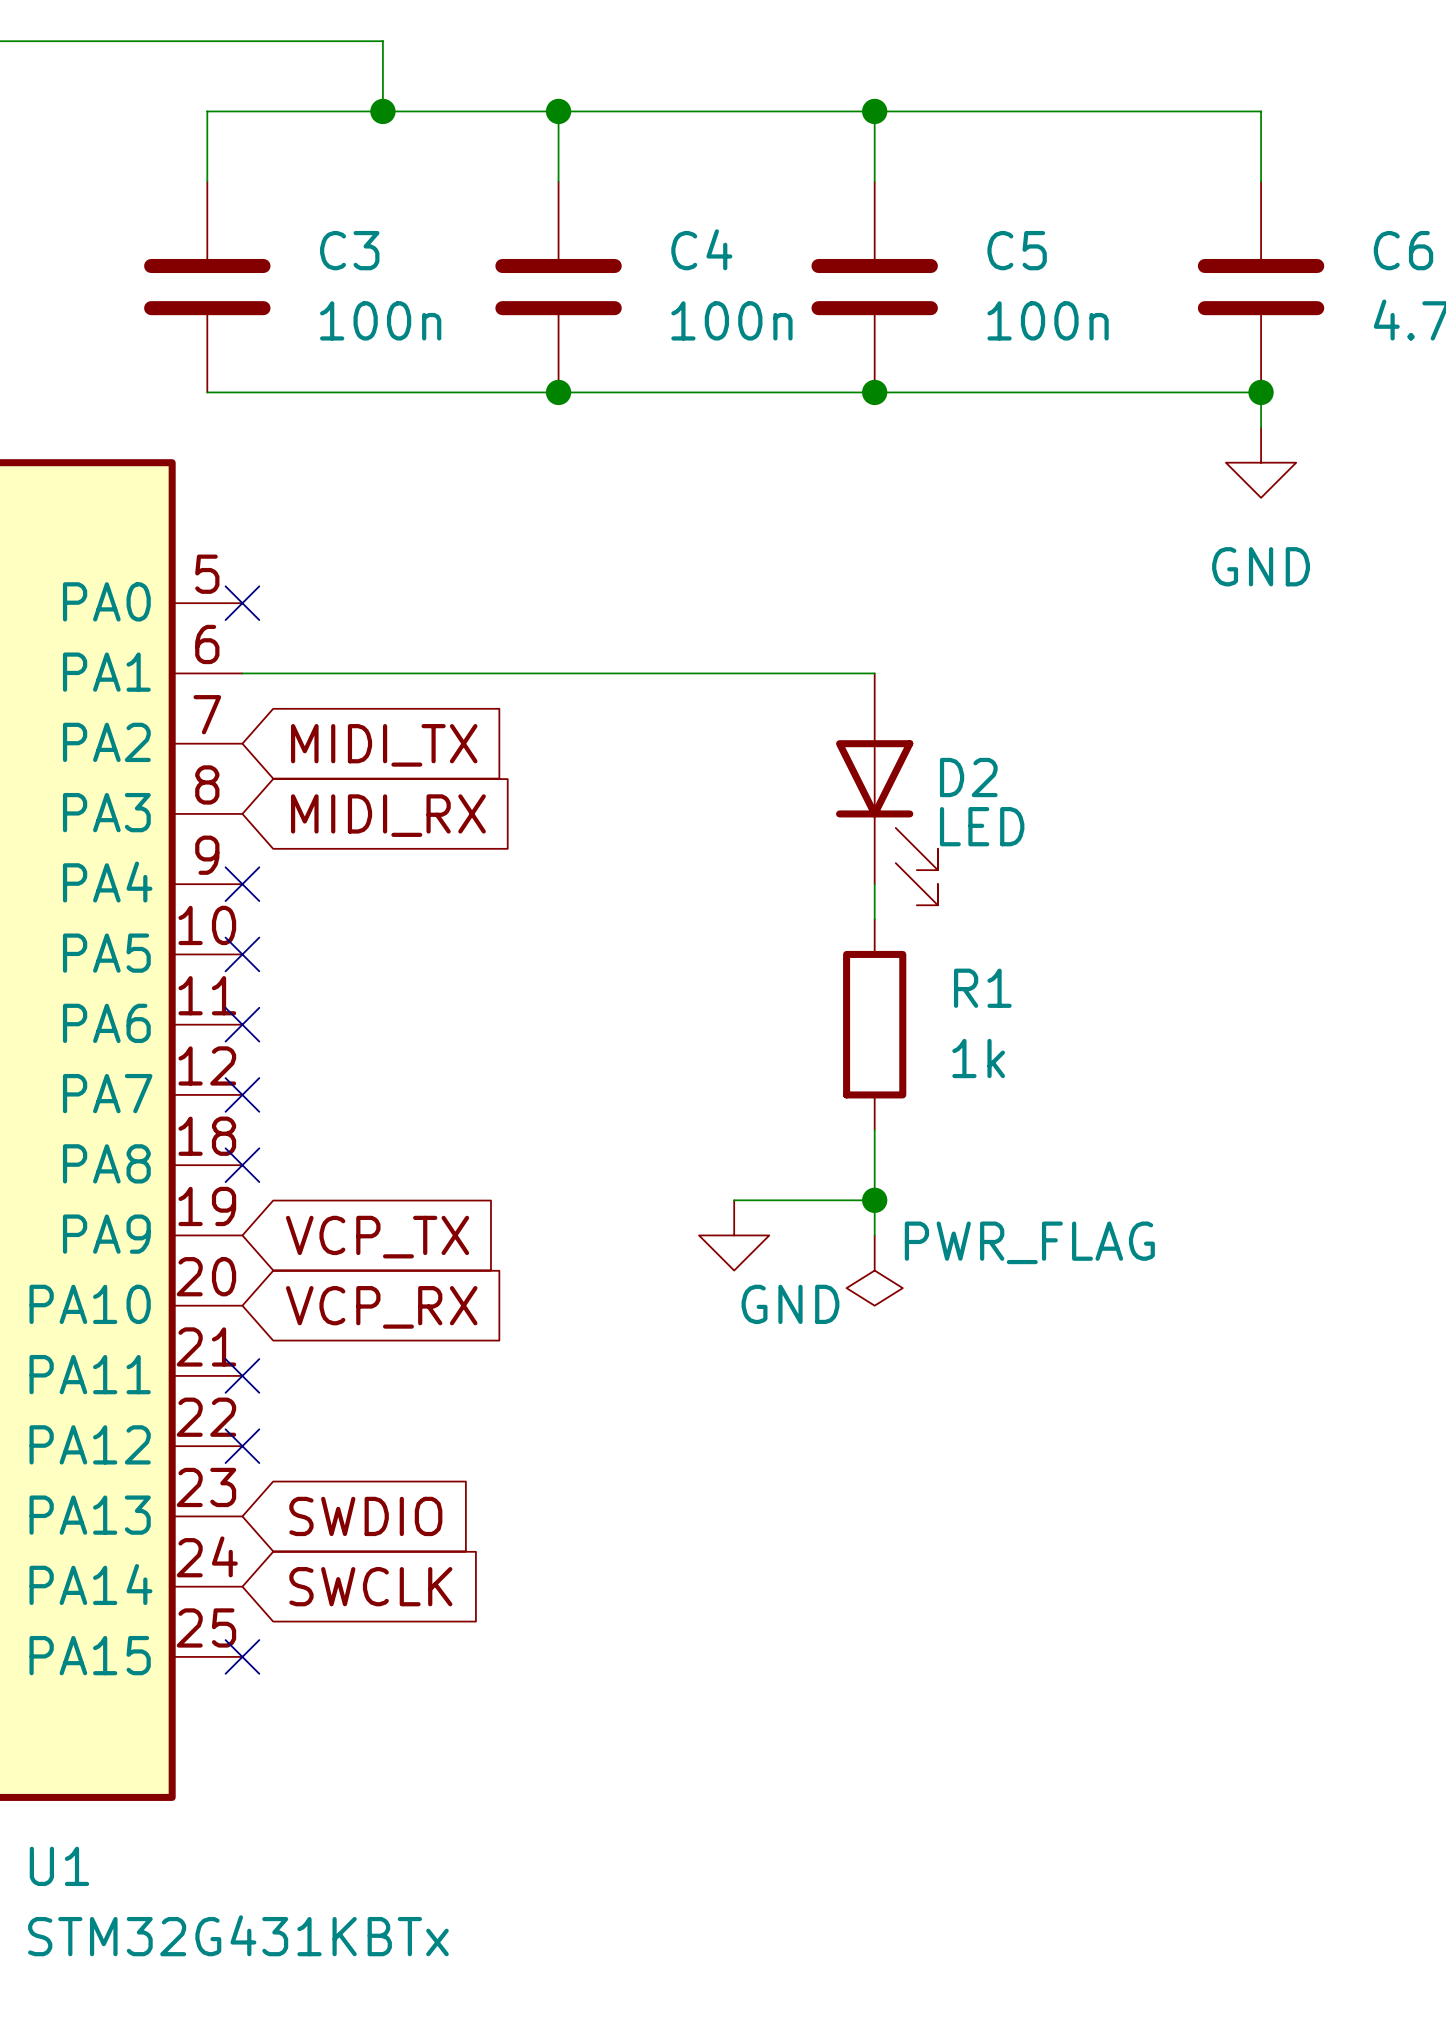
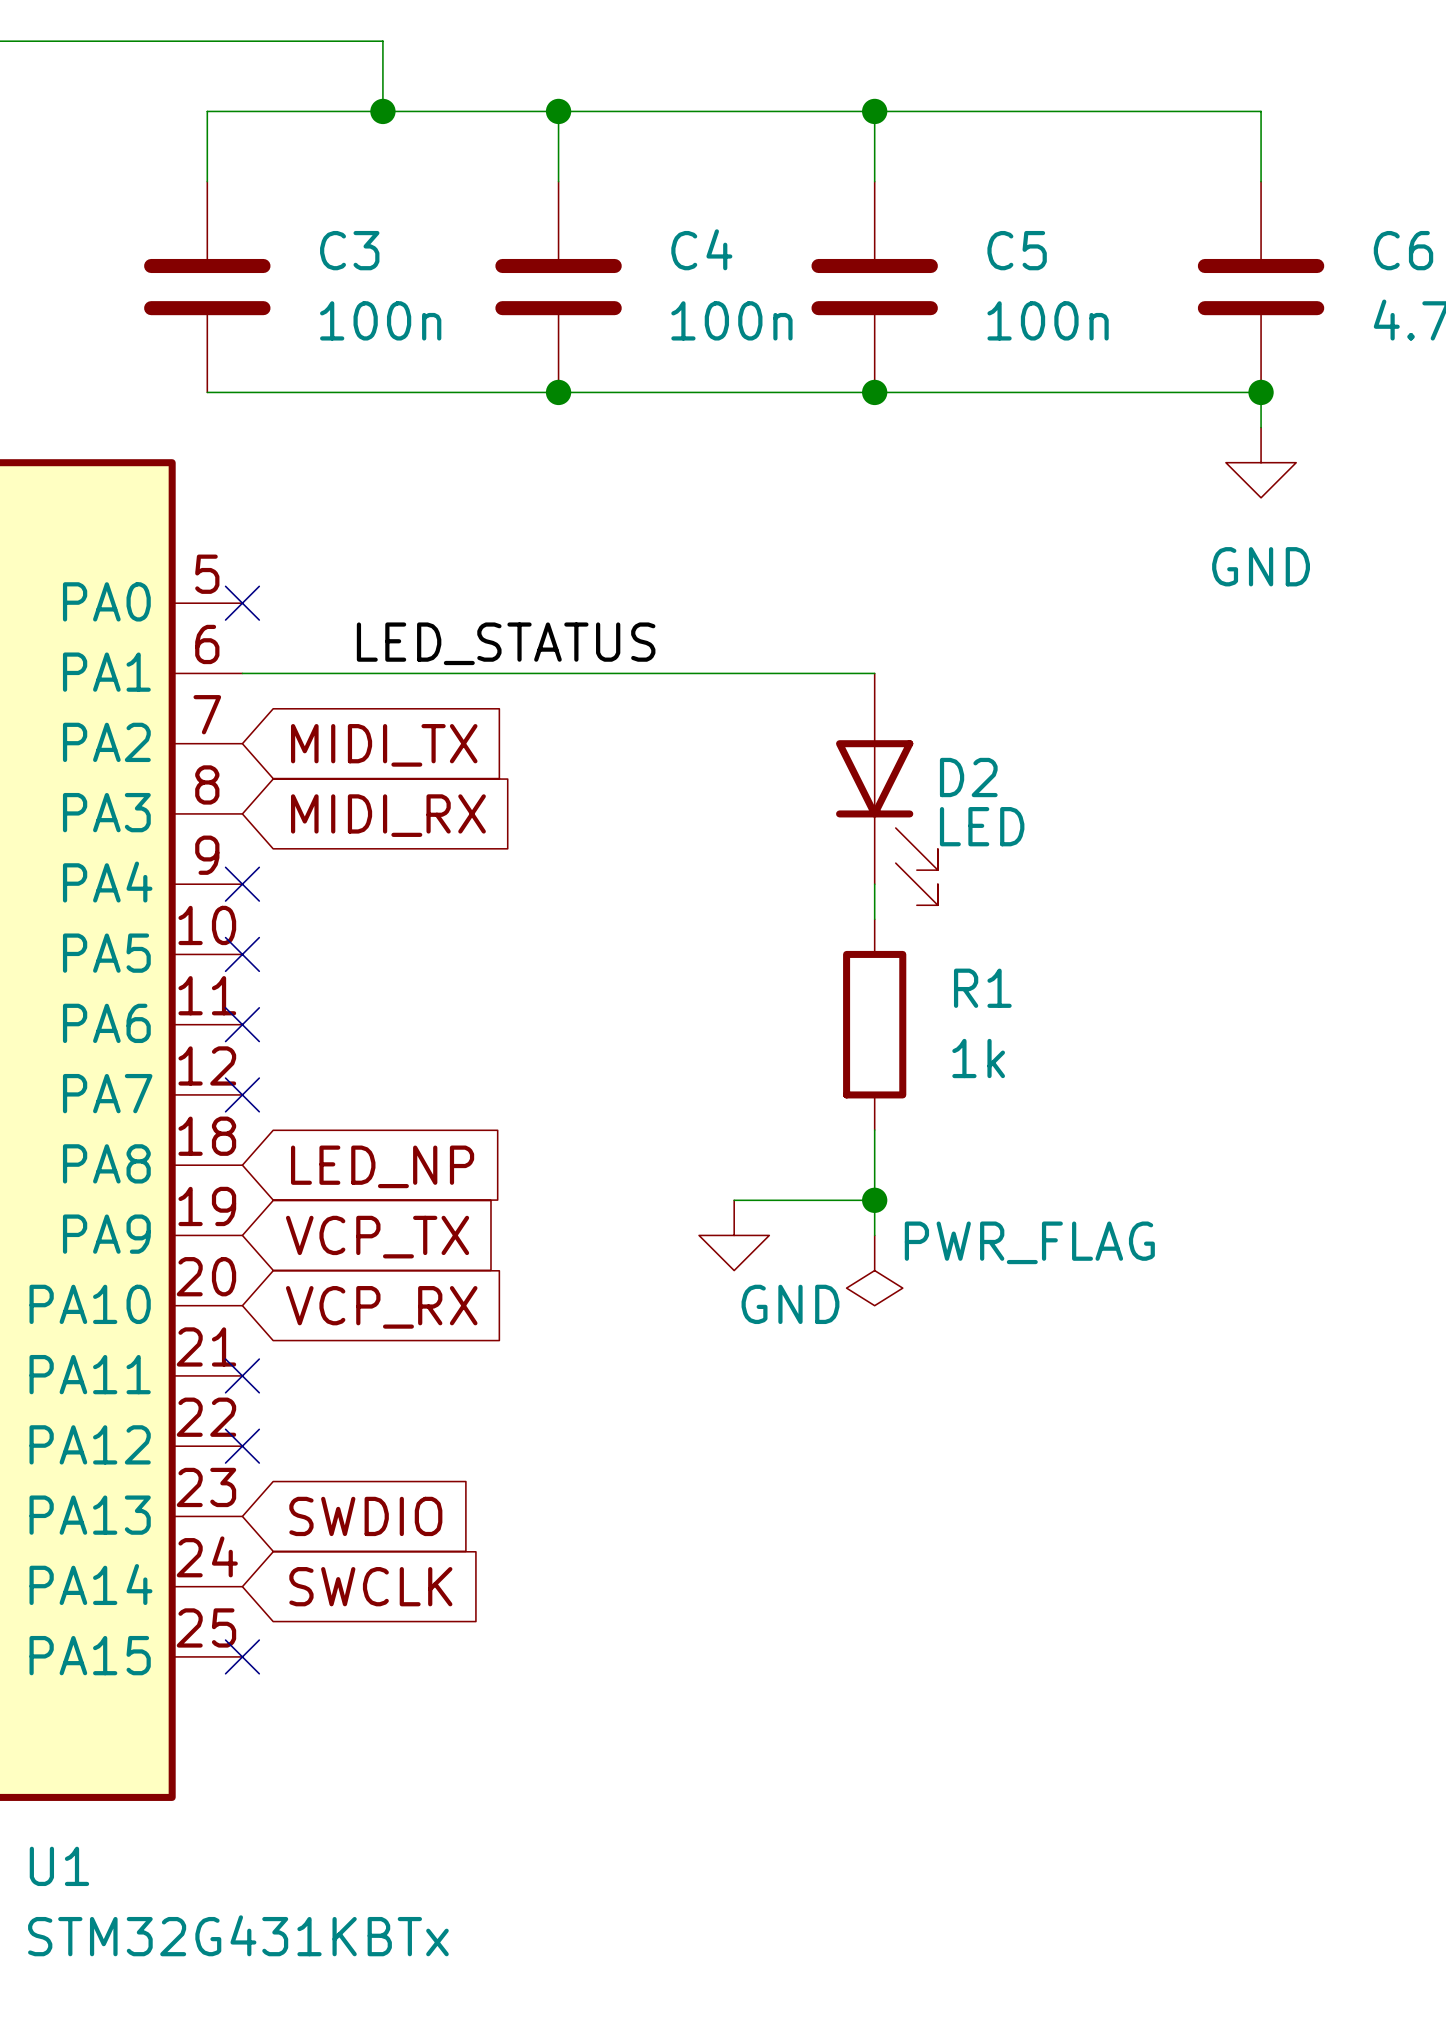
label: none -> LED_STATUS (506, 643)
no-connect mark: (242, 1165) -> none
global label: none -> LED_NP (382, 1166)

